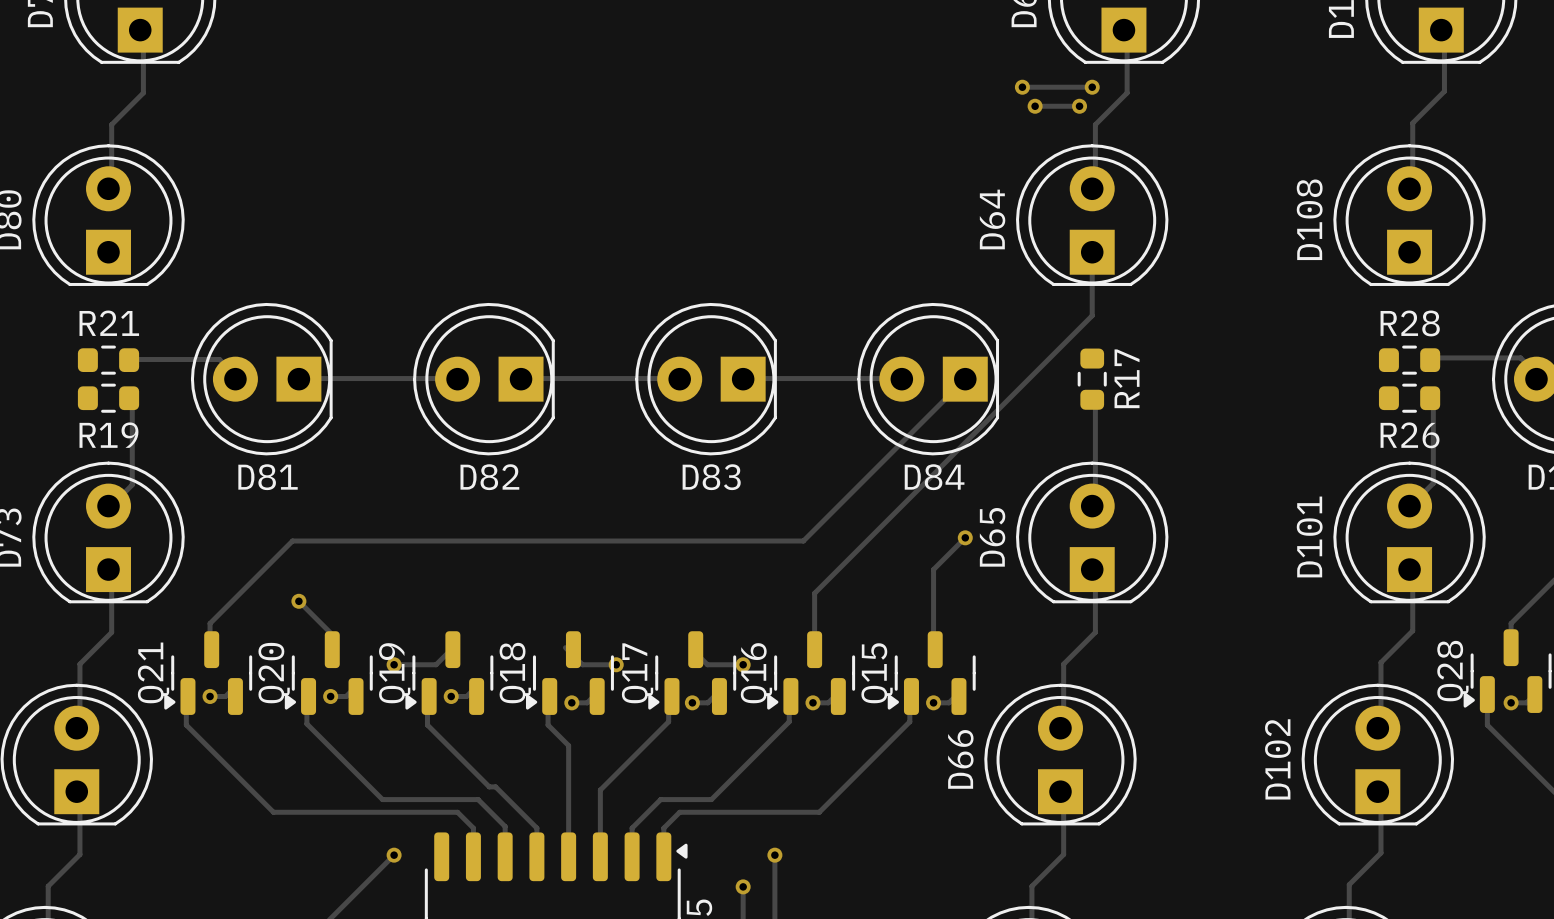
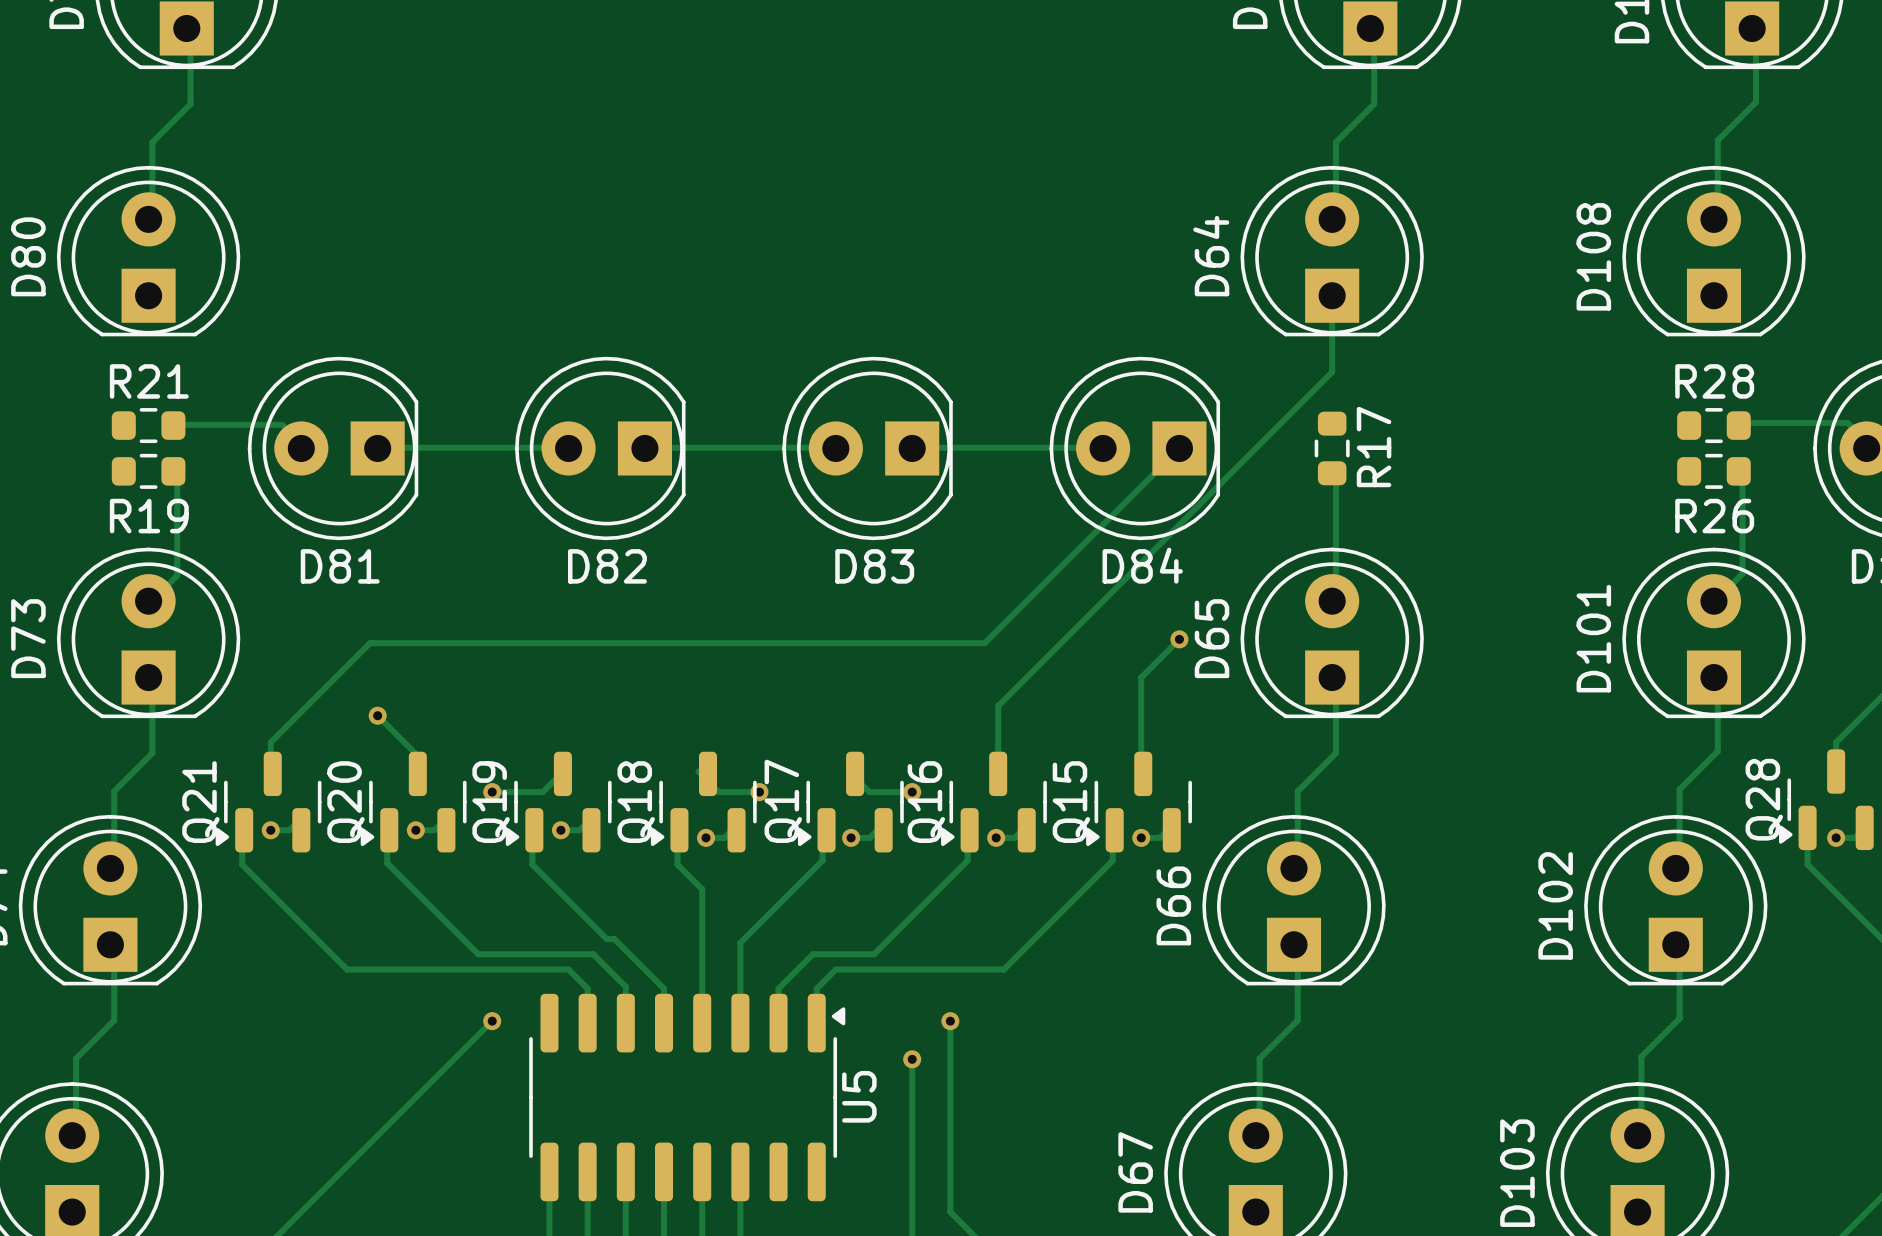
track: (1022, 87) (1092, 87) -> none
via: (1022, 87) -> none
via: (1092, 87) -> none
track: (1035, 106) (1079, 106) -> none
via: (1035, 106) -> none
via: (1079, 106) -> none

